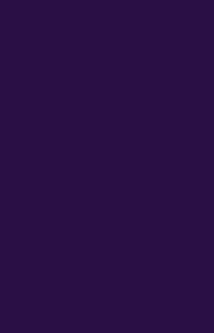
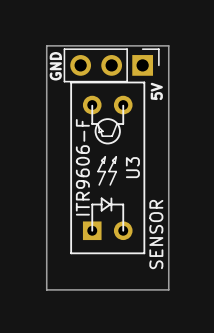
board edge: none -> (46, 45) (168, 45) (168, 289) (46, 289) (46, 45)
part: none -> SENSOR (111, 65)
text: none -> GND (55, 66)
text: none -> 5V (156, 91)
U3: none -> ITR9606-F (107, 167)

